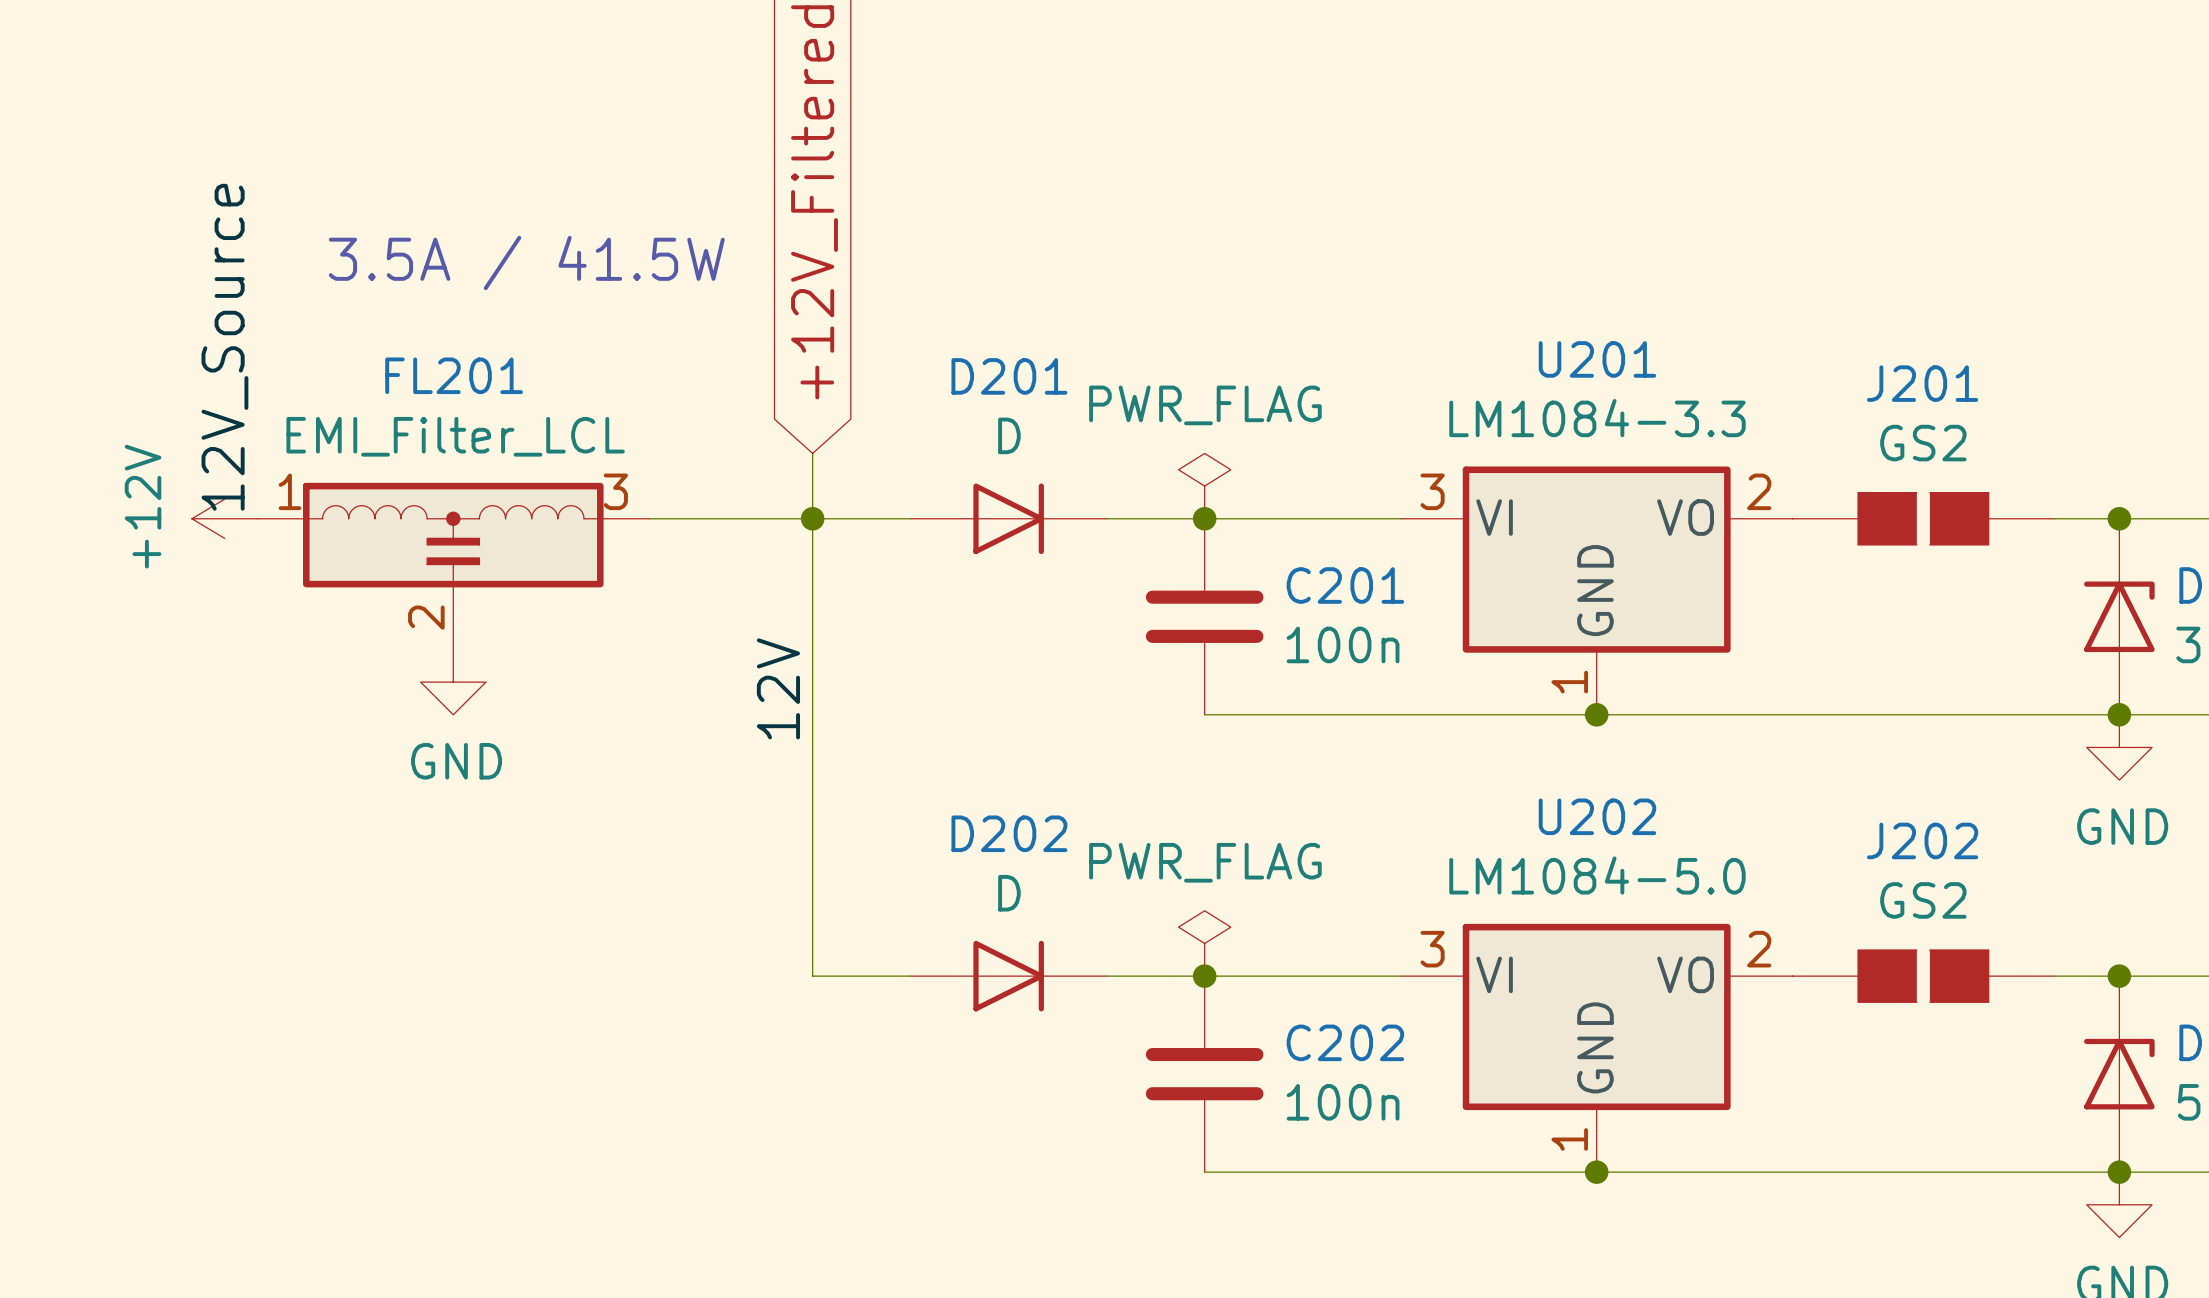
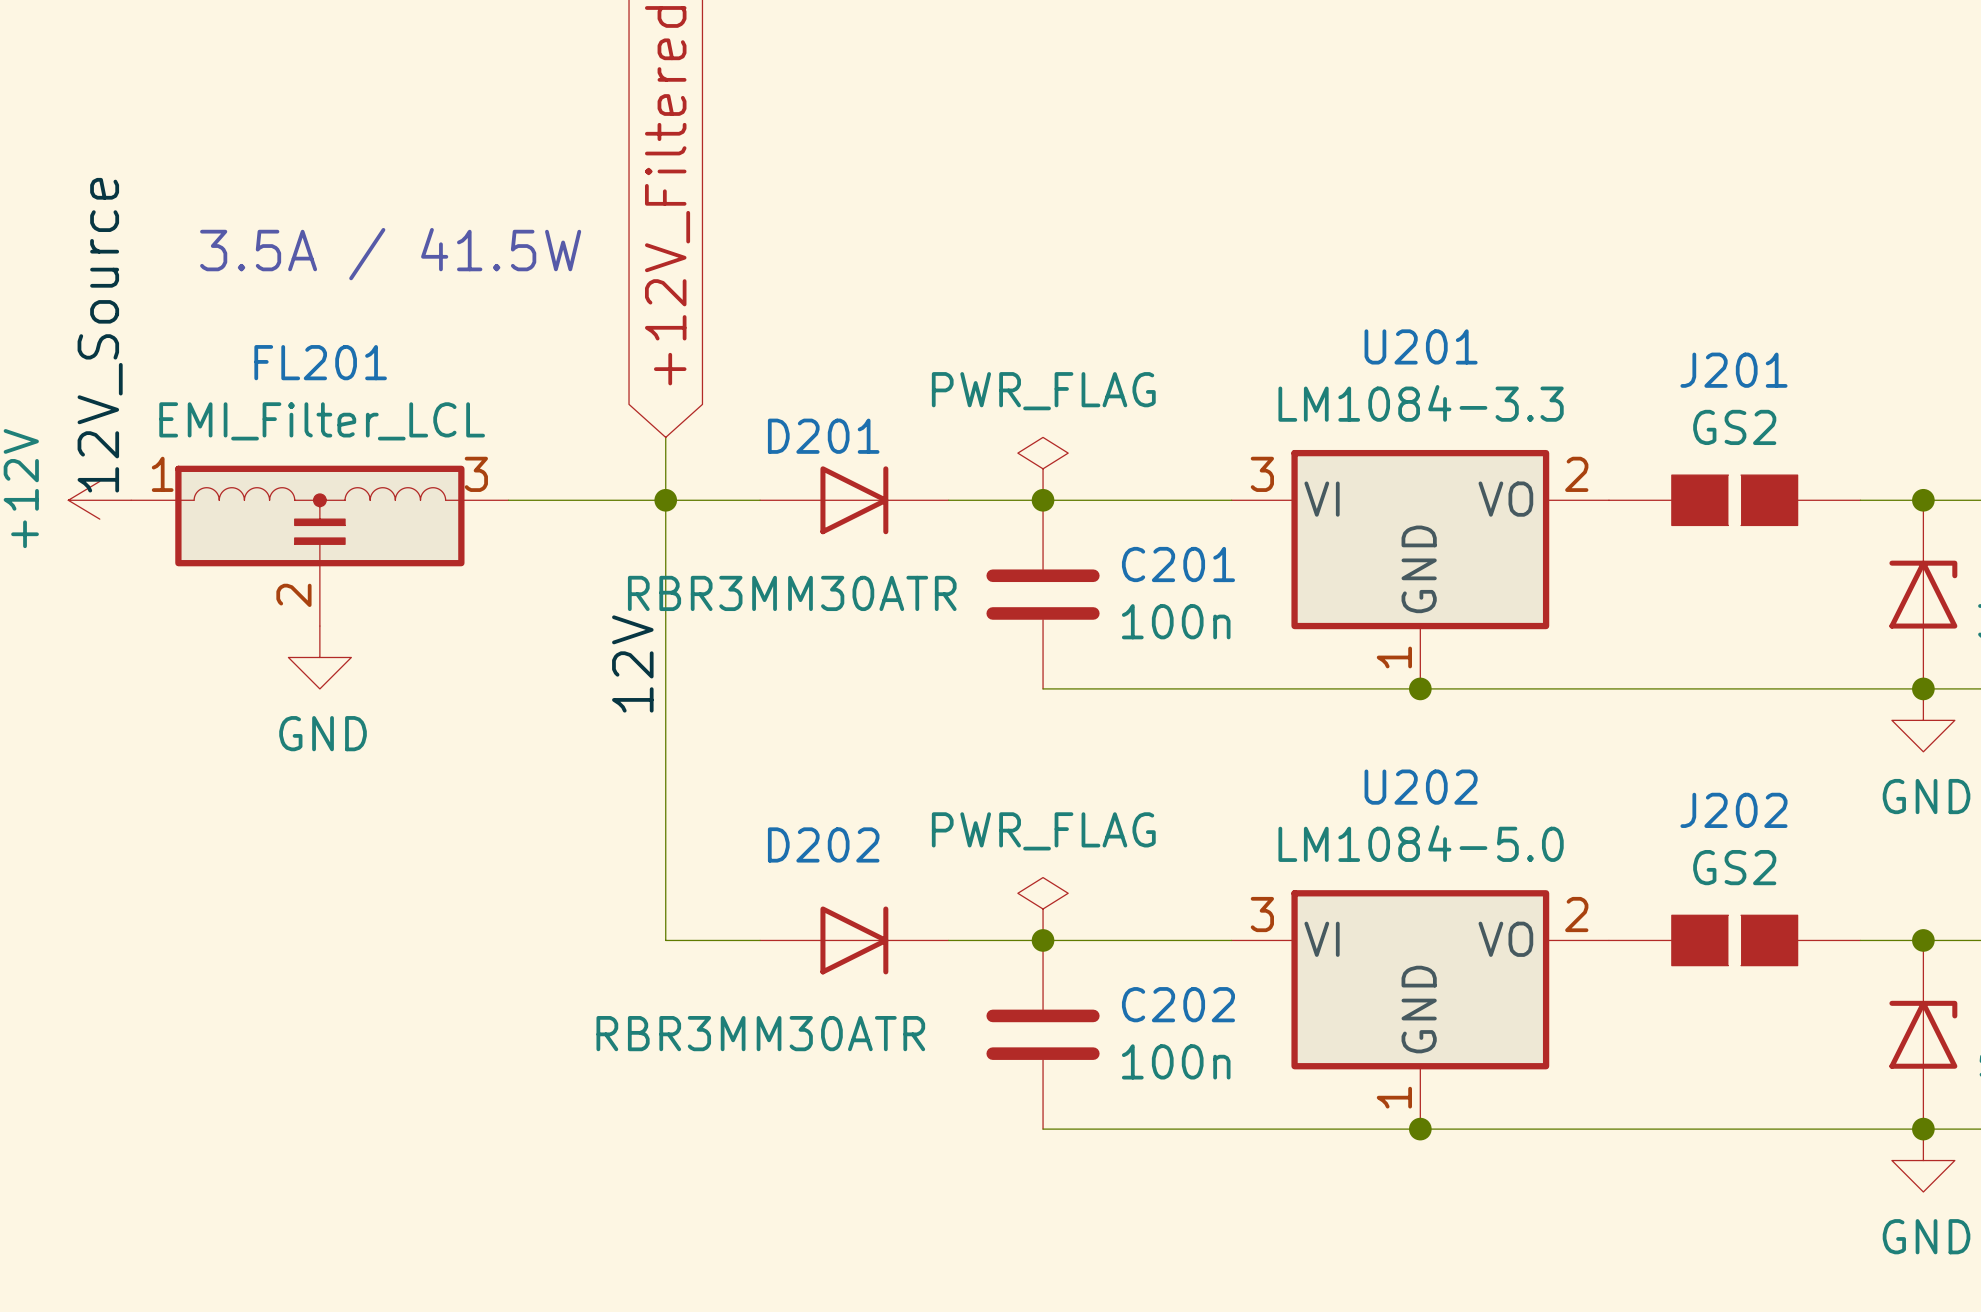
D201 name position: D201 (1009, 376) -> D201 (823, 436)
D201 value: D (1009, 435) -> RBR3MM30ATR (792, 593)
D202 name position: D202 (1009, 833) -> D202 (823, 844)
D202 value: D (1009, 893) -> RBR3MM30ATR (760, 1033)

